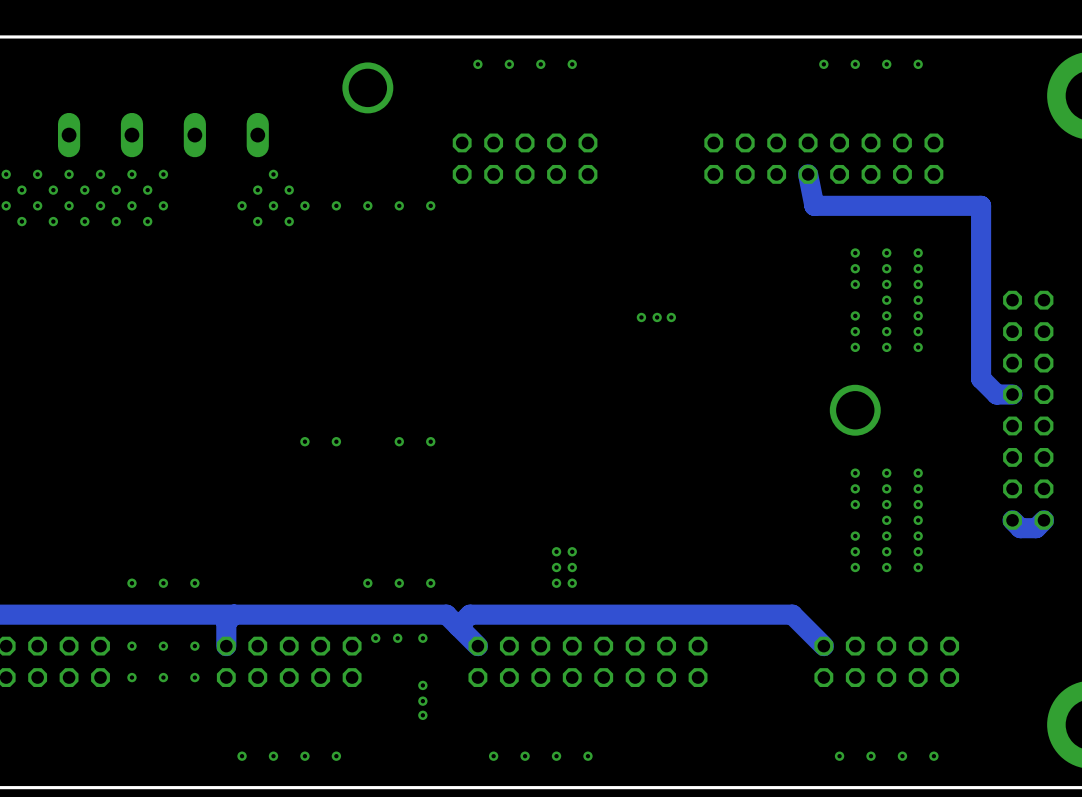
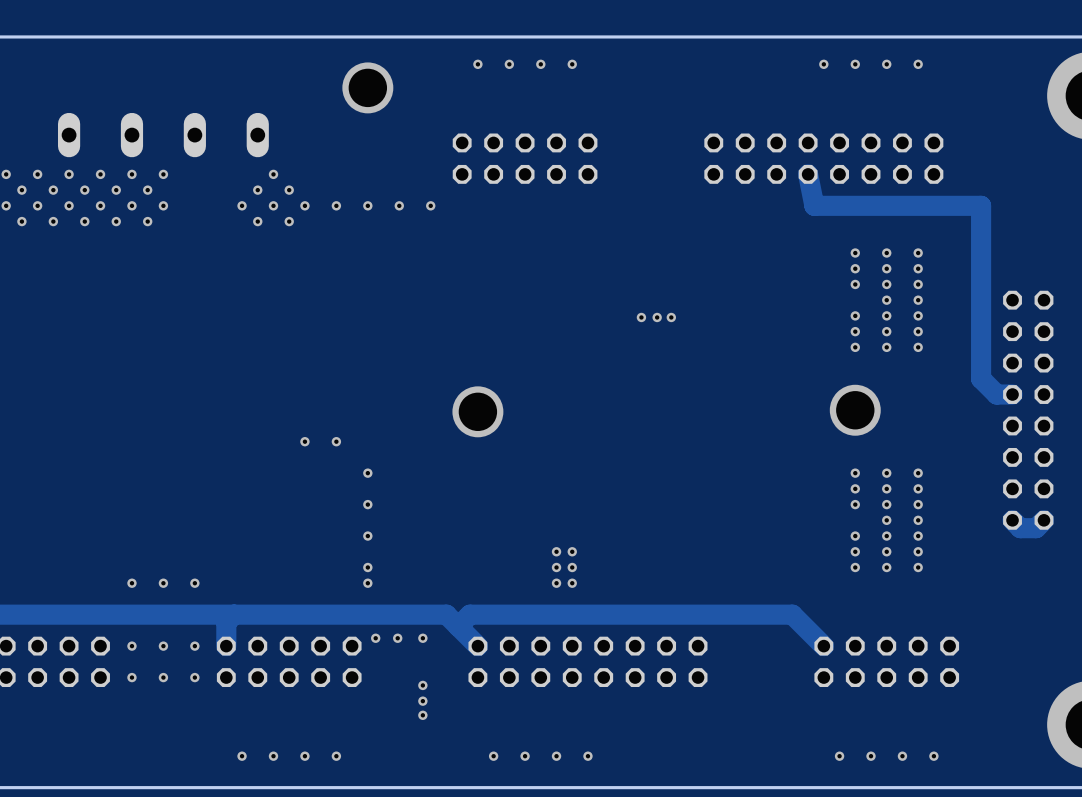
via: none -> (477, 411)
via: (399, 441) -> none
via: (430, 441) -> none
via: none -> (367, 473)
via: none -> (367, 504)
via: none -> (367, 536)
via: none -> (367, 567)
via: (399, 583) -> none
via: (430, 583) -> none

